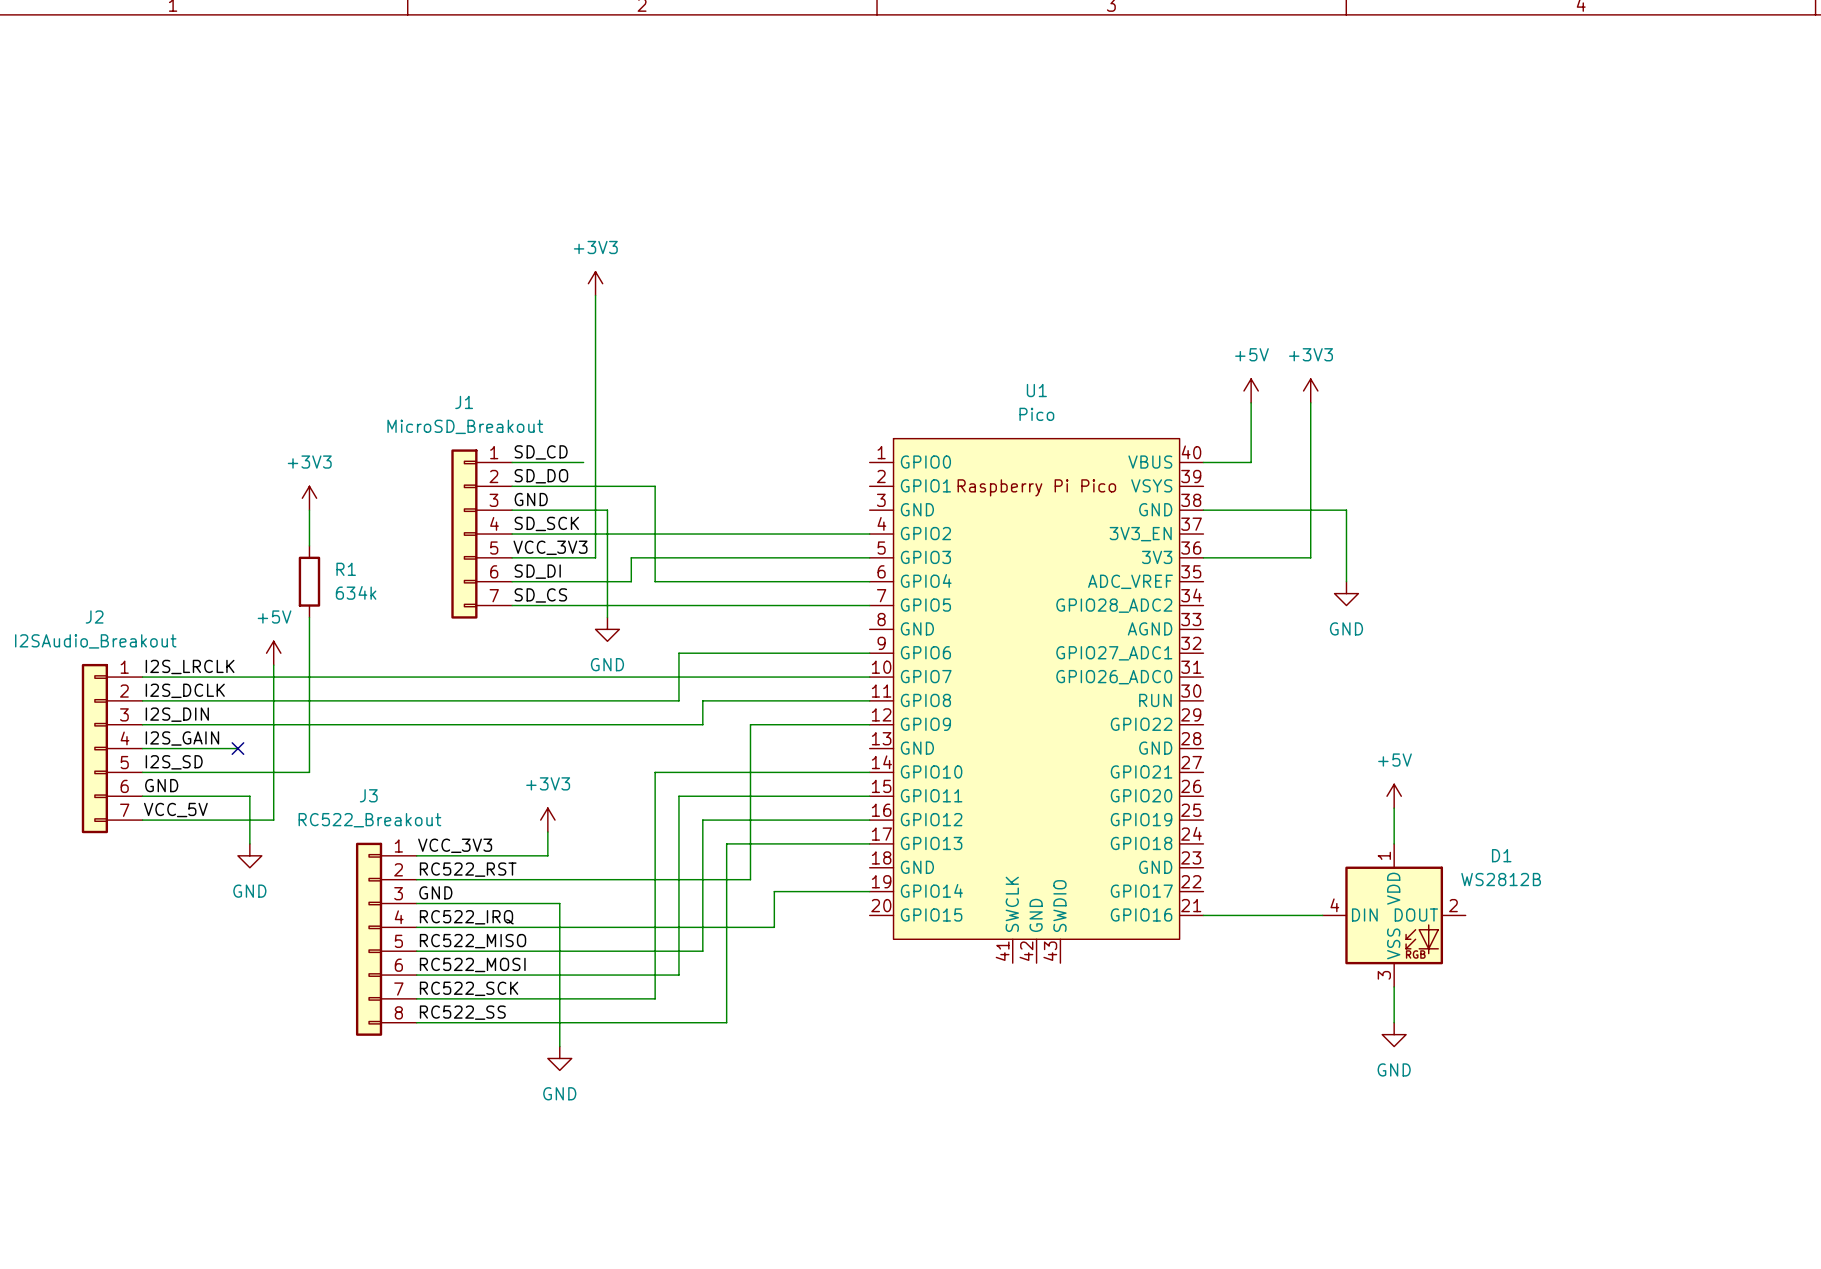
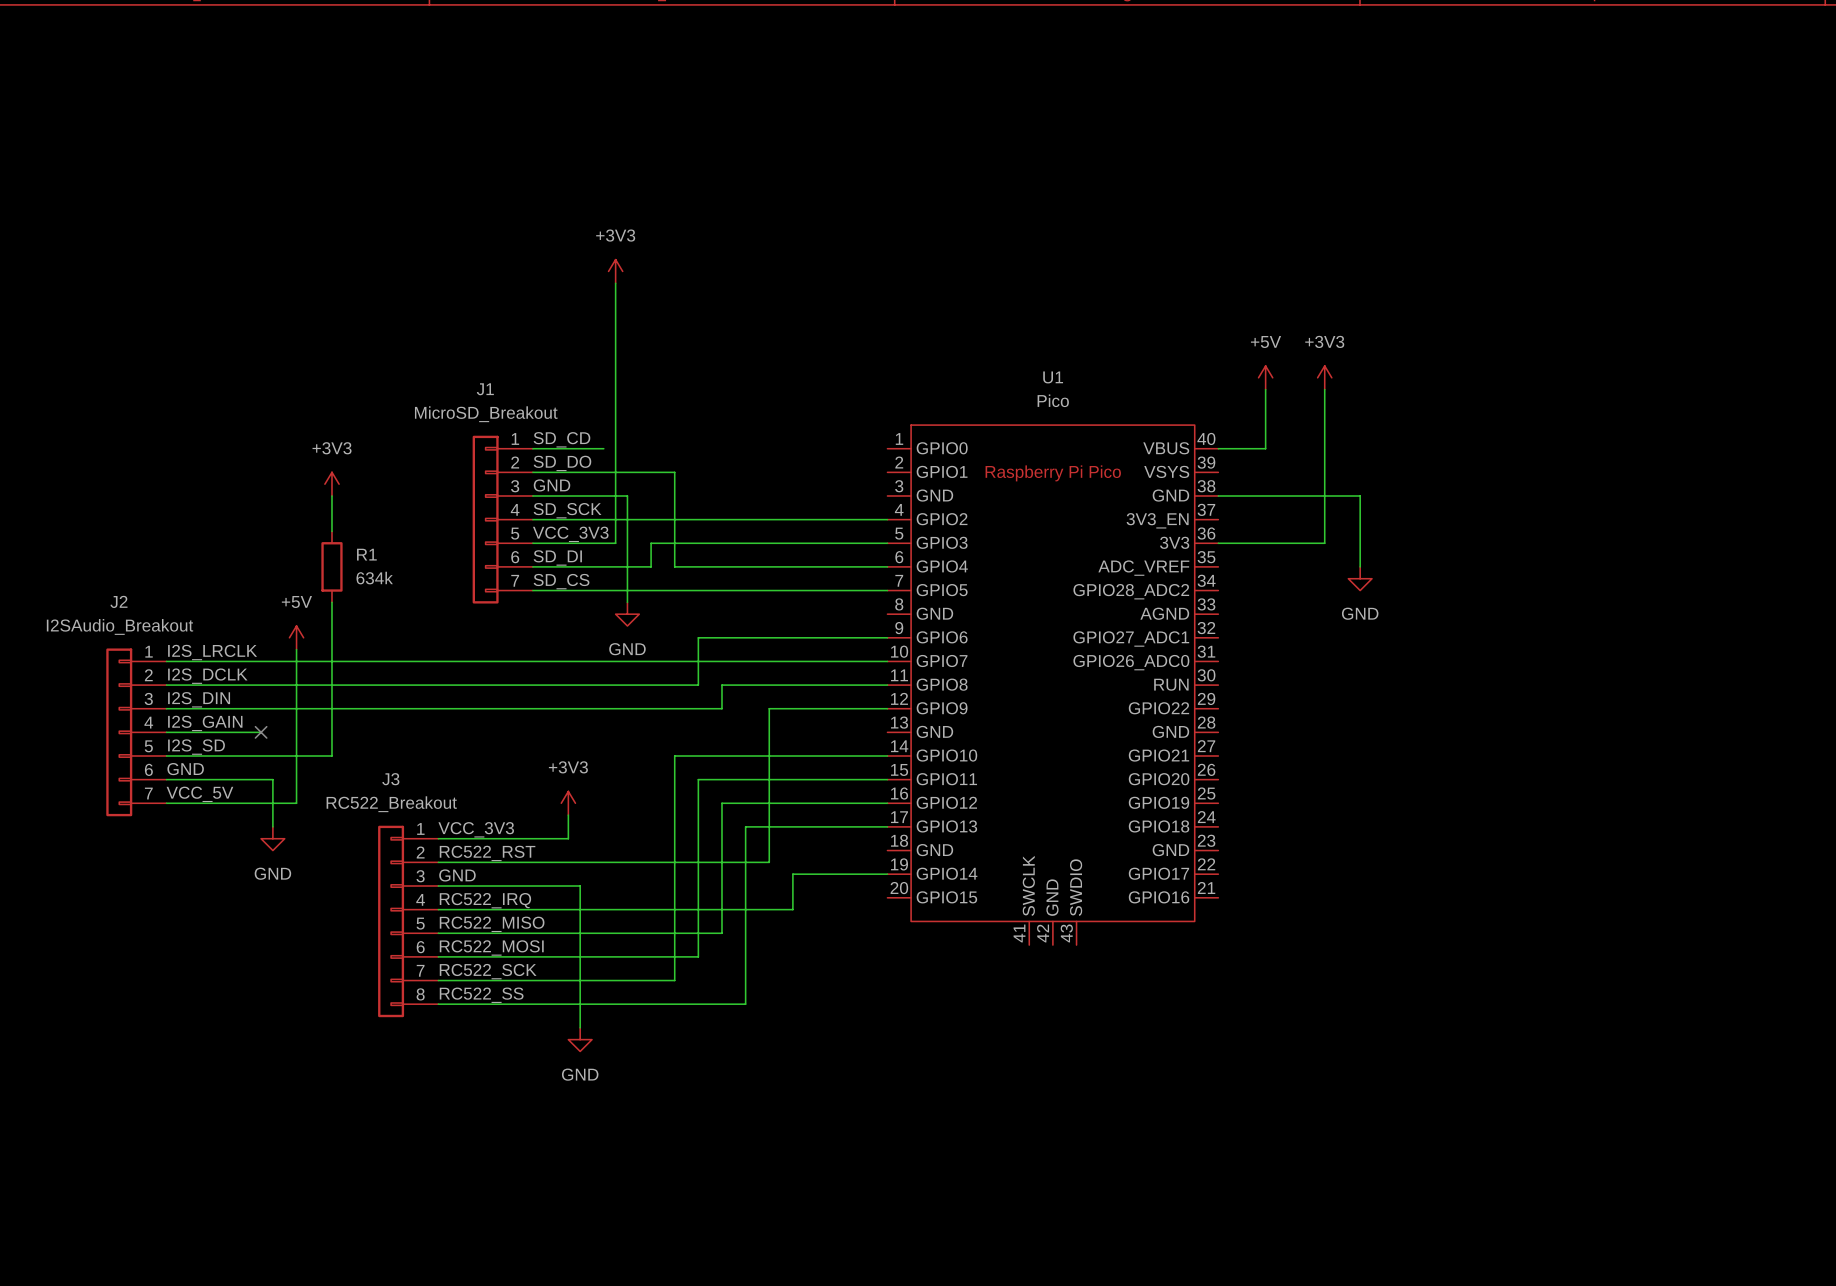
power symbol: +5V (1394, 796) -> none
wire: (1394, 808) (1394, 843) -> none
wire: (1203, 915) (1322, 915) -> none
D1: WS2812B (1394, 915) -> none
wire: (1394, 986) (1394, 1022) -> none
power symbol: GND (1394, 1034) -> none

